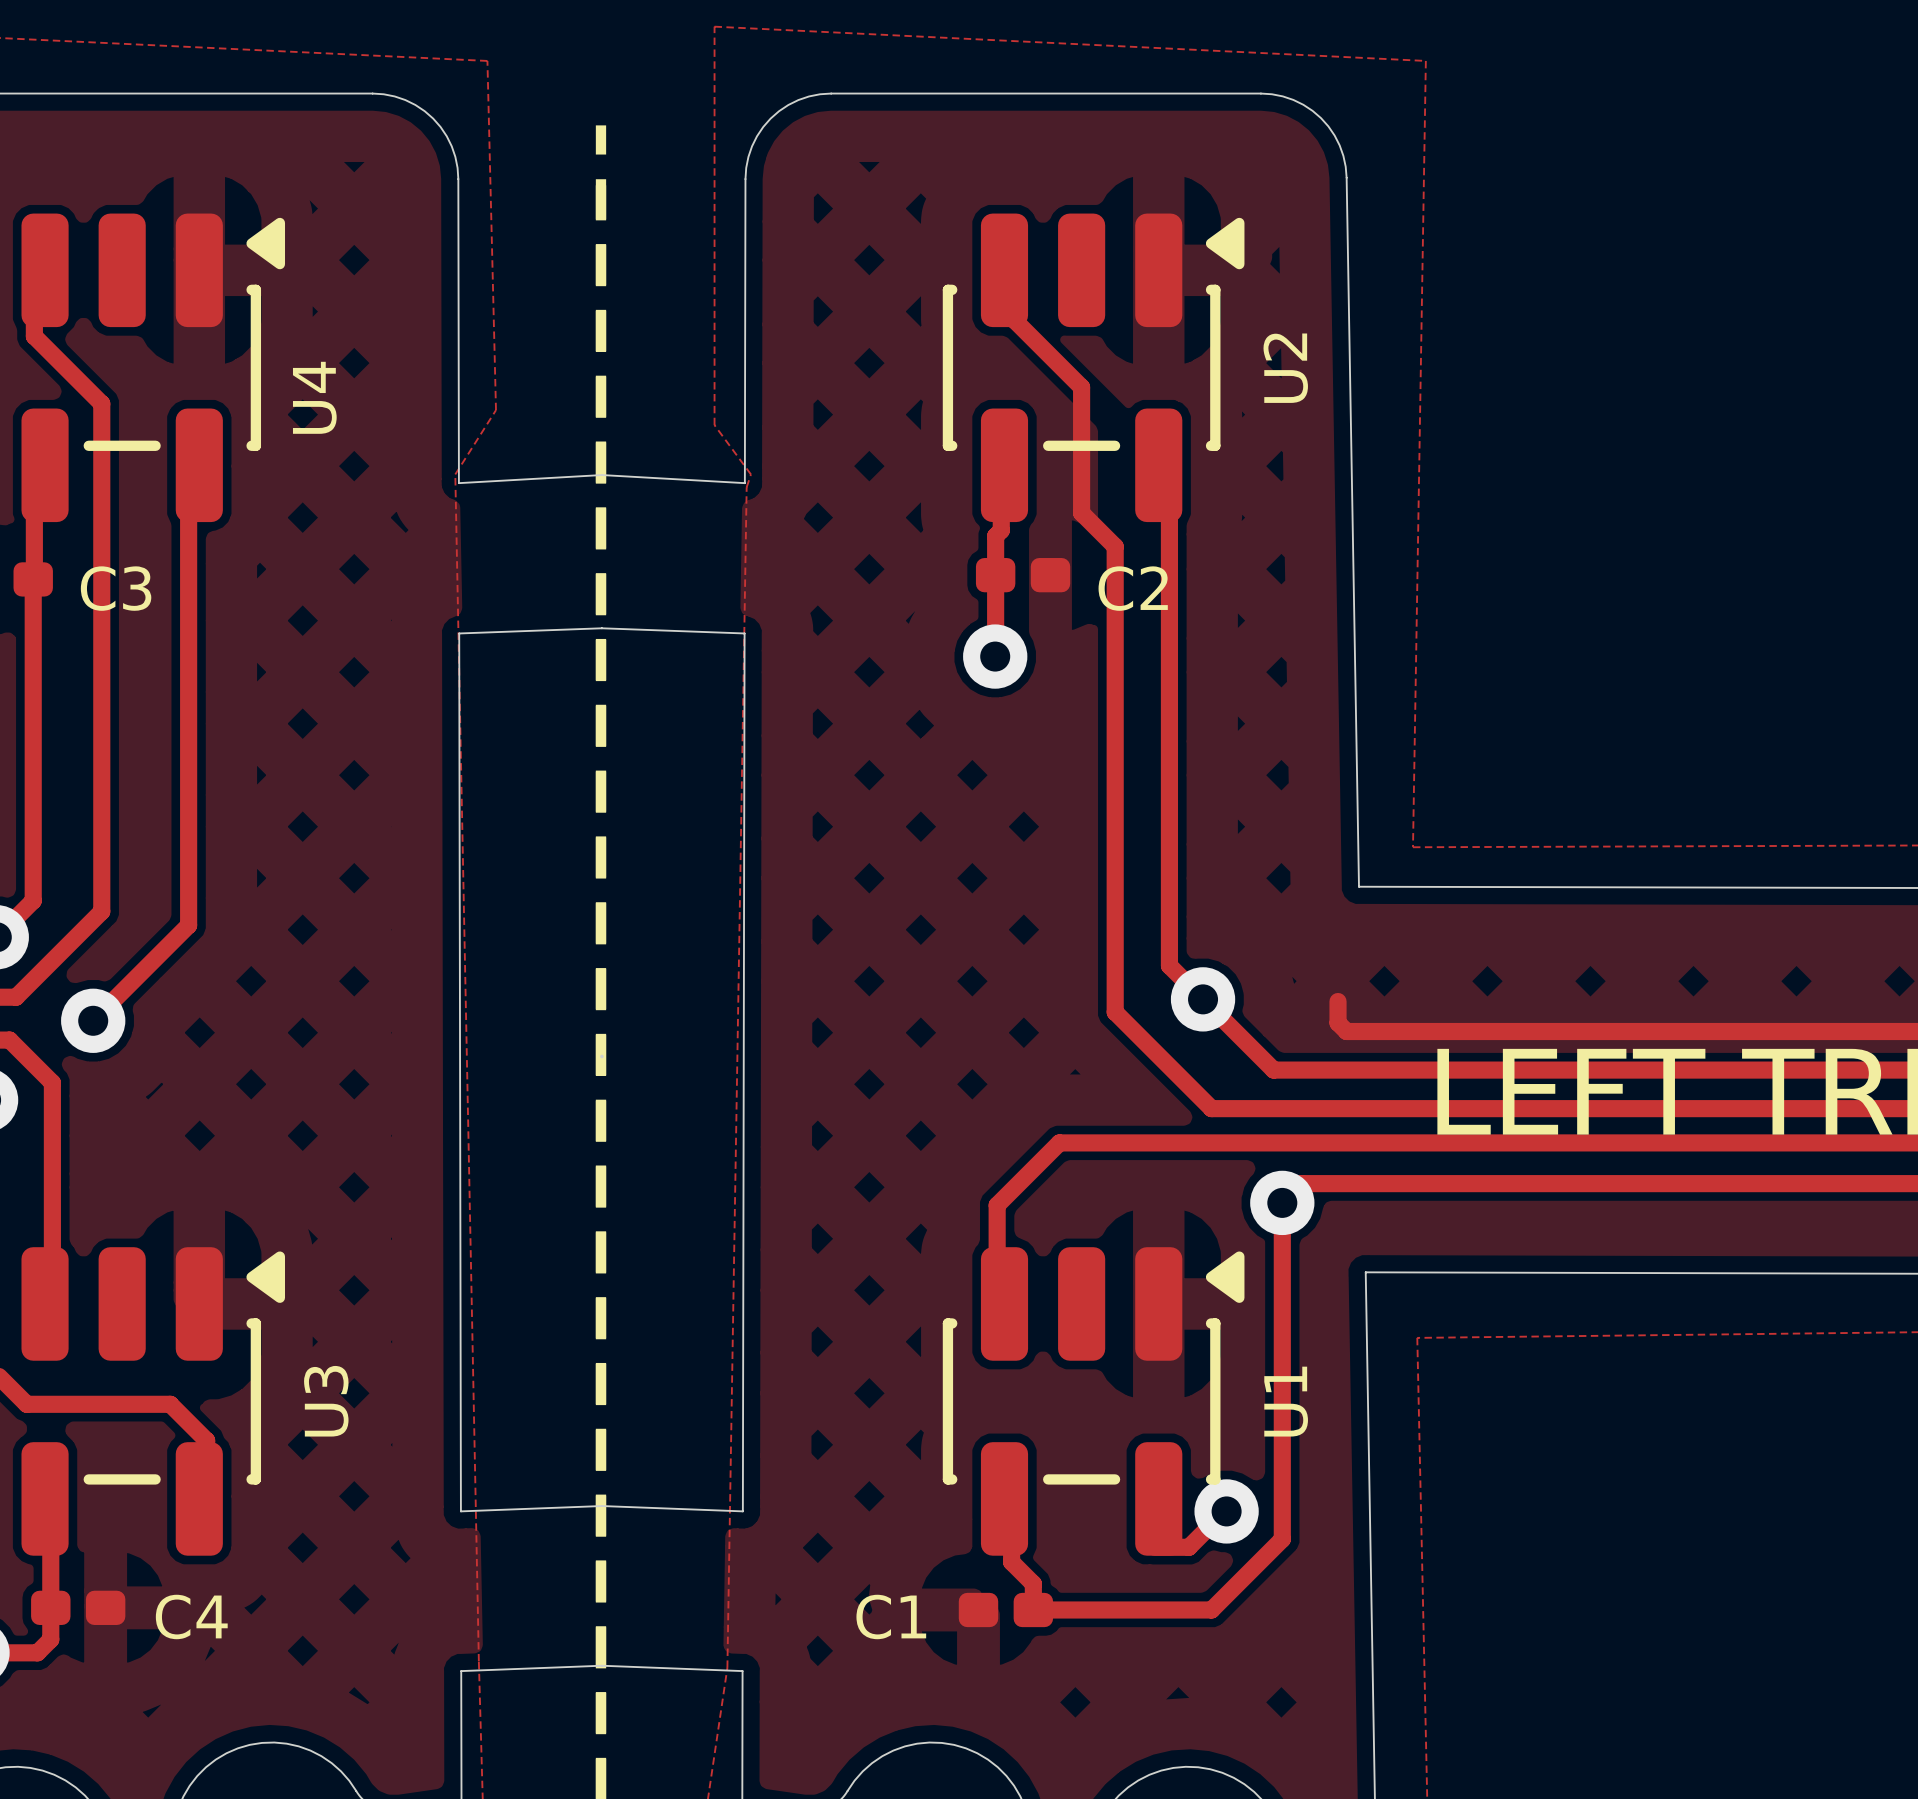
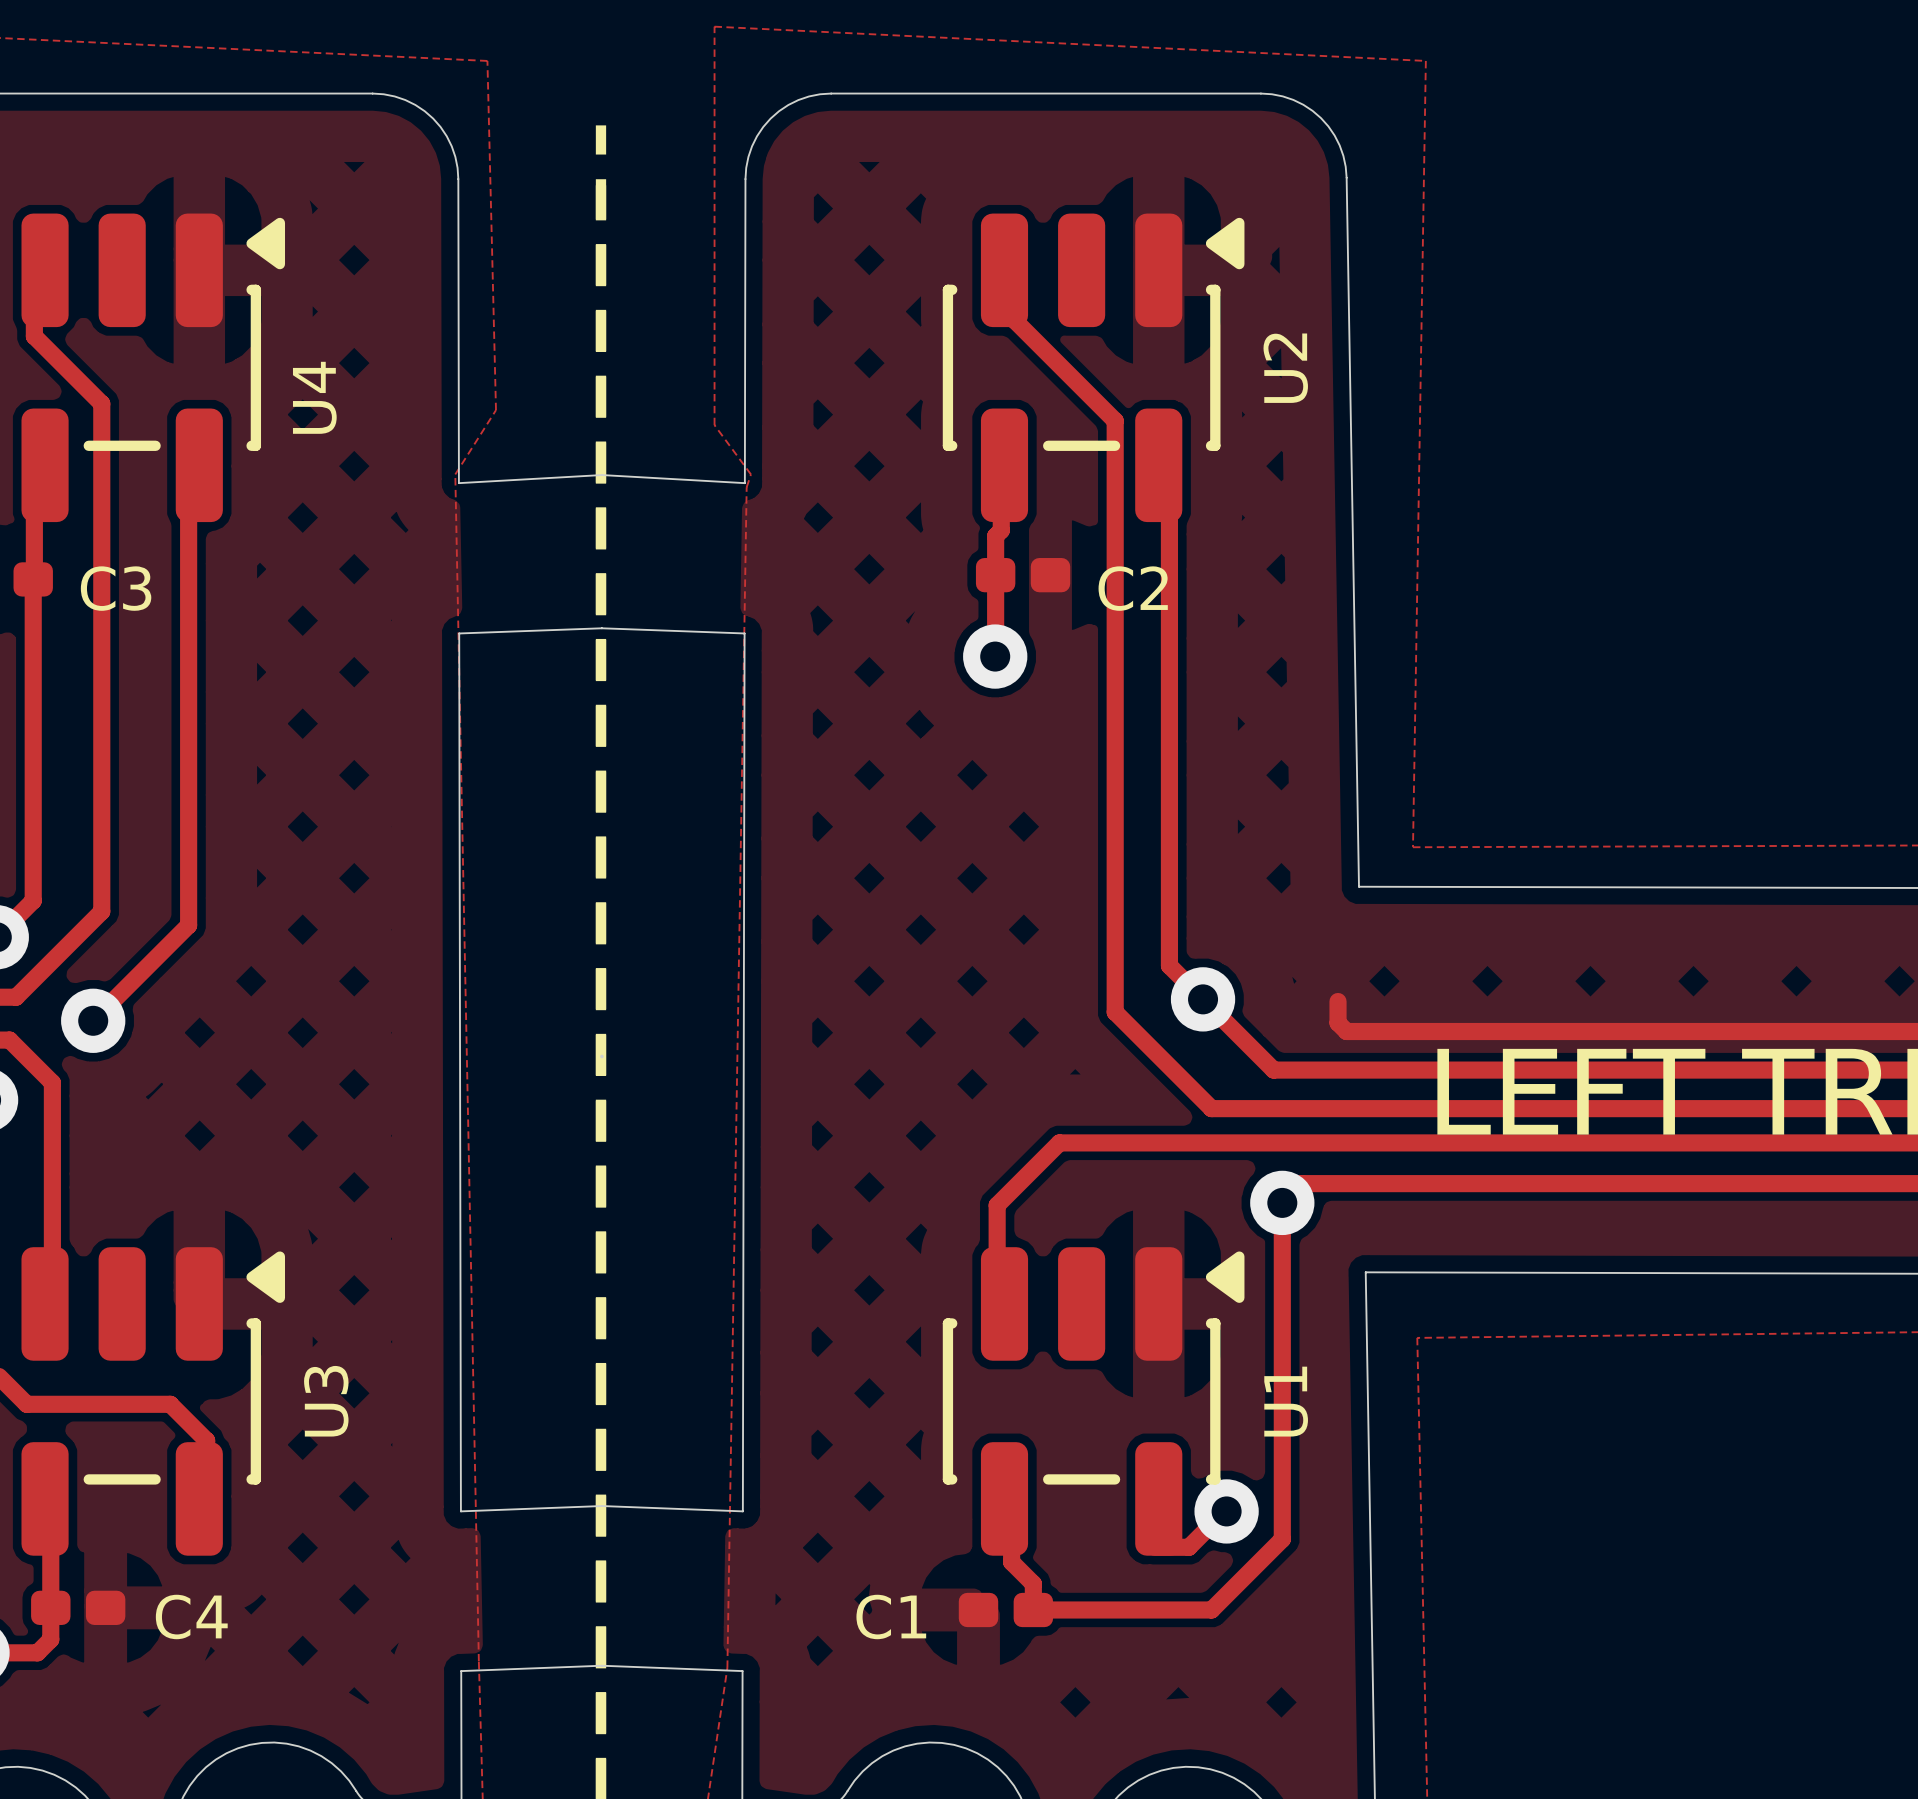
track: (1081, 387) (1081, 513) (1115, 546) -> (1081, 387) (1115, 420) (1115, 546)

